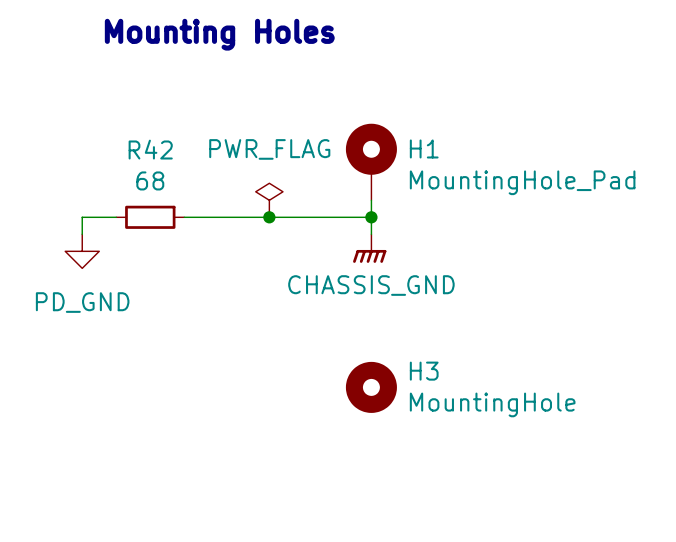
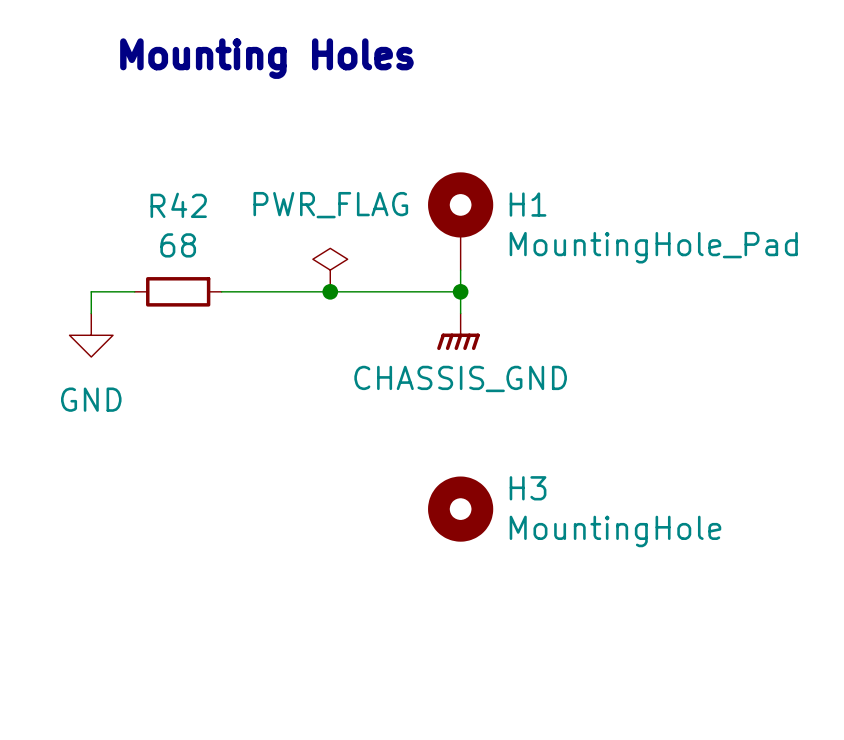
power symbol: PD_GND (82, 251) -> GND (91, 335)

